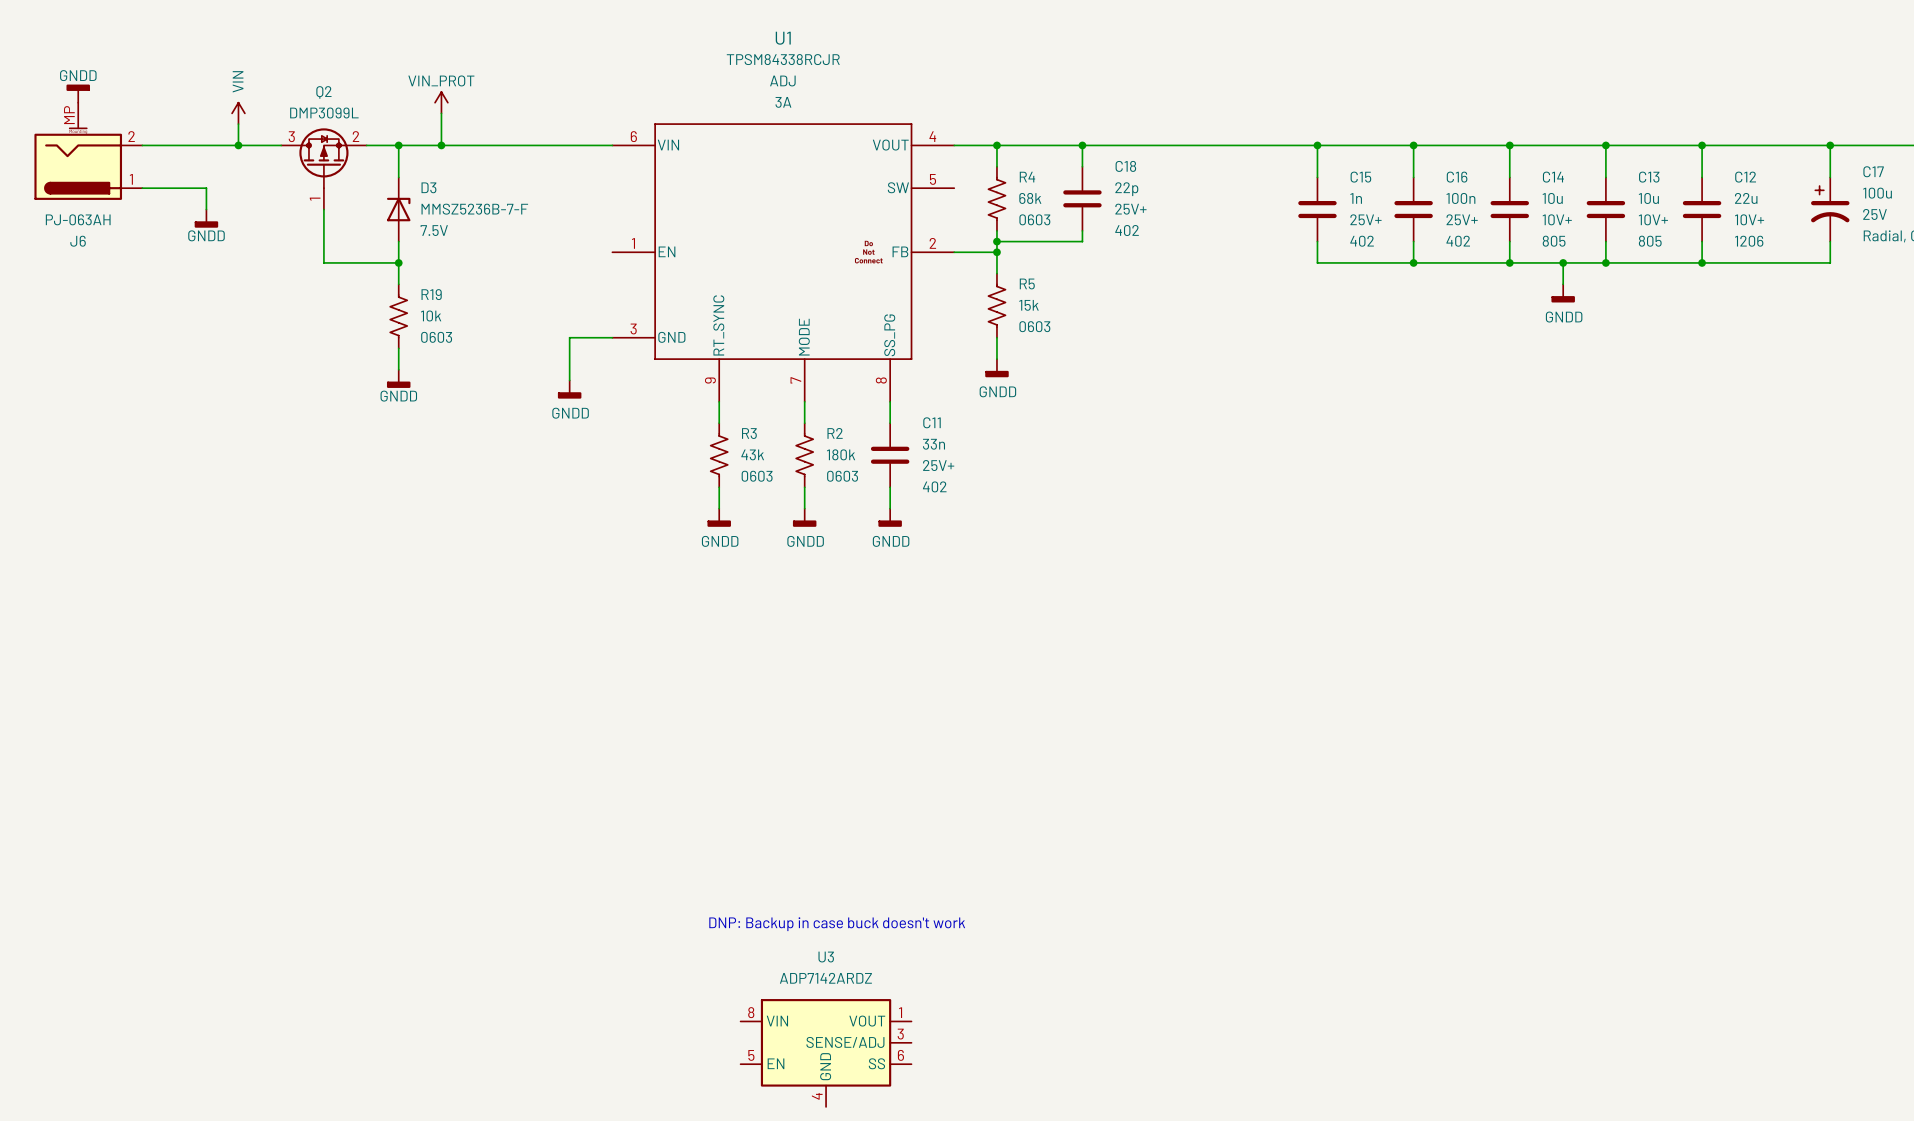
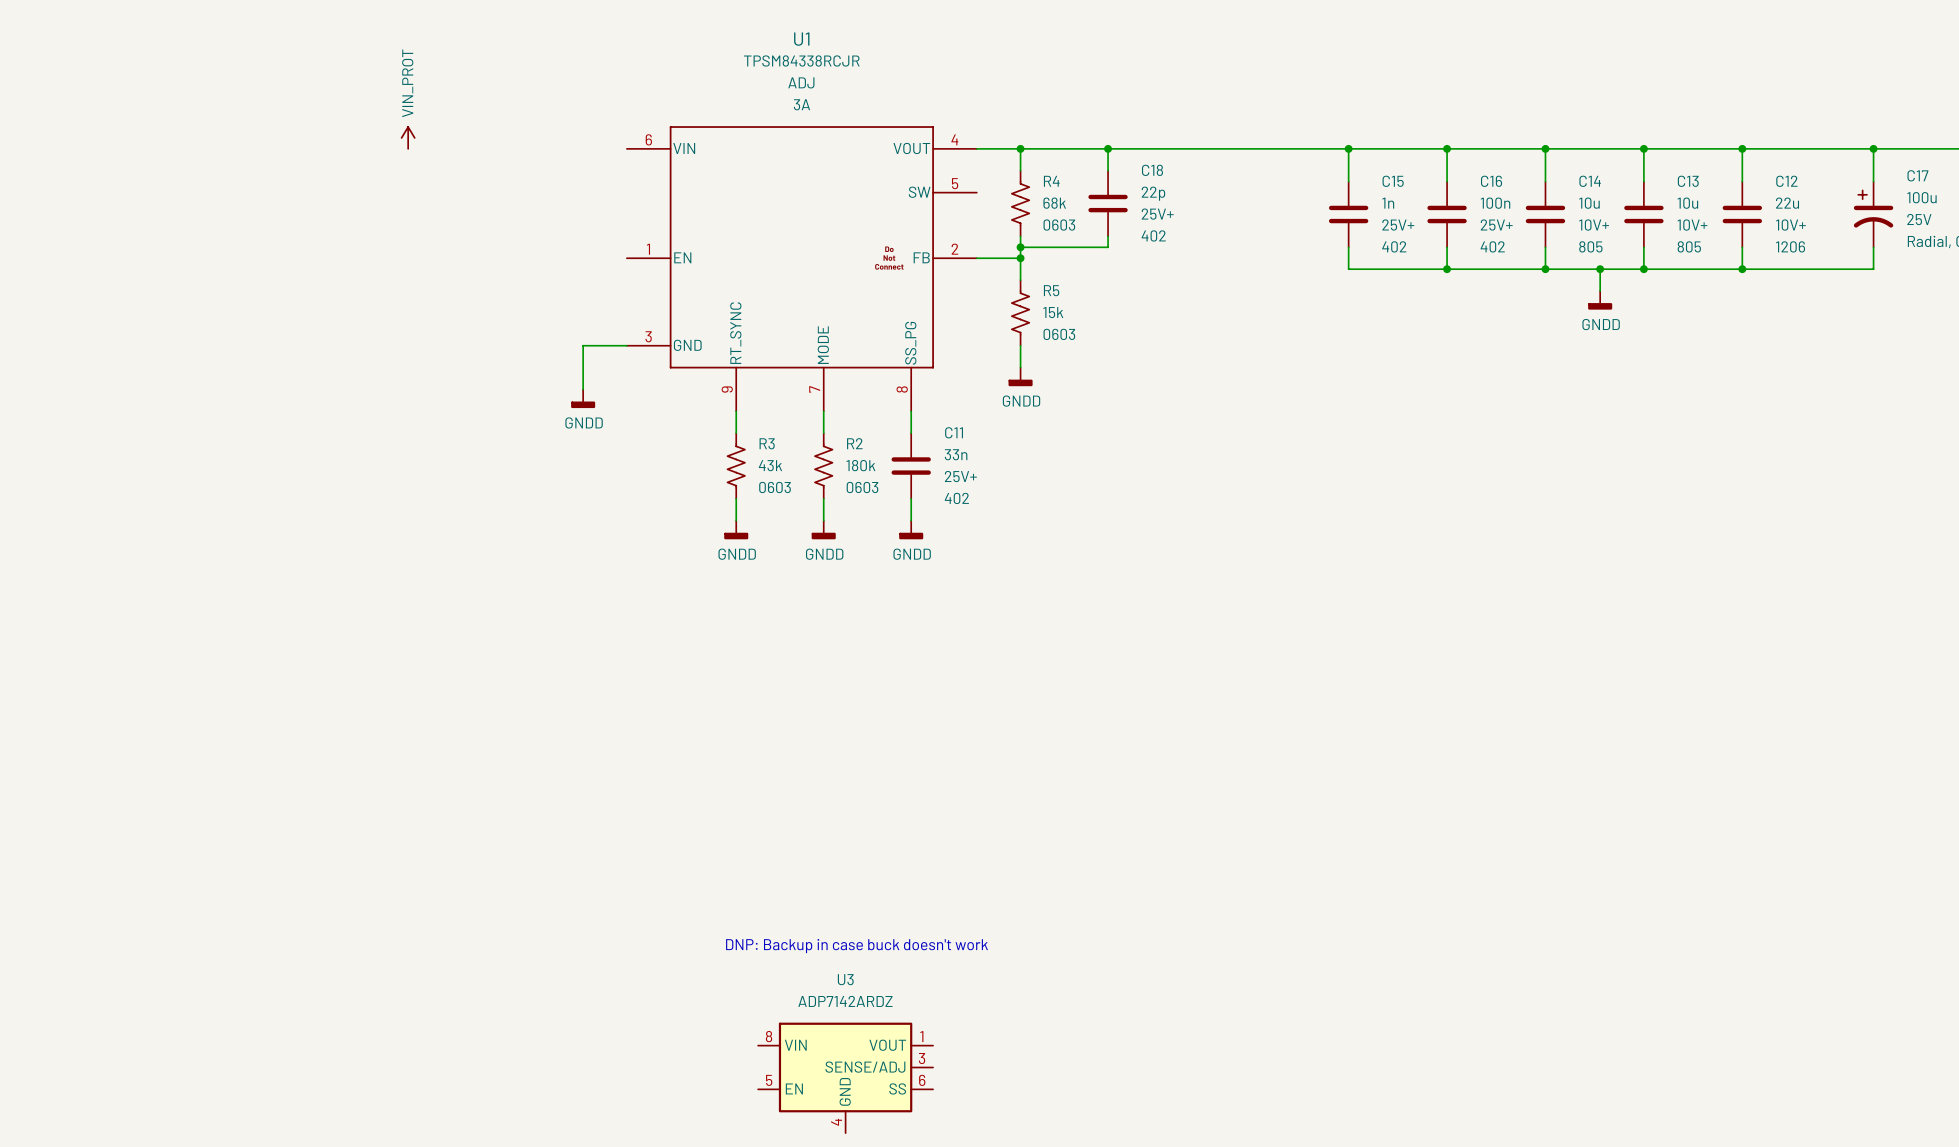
power symbol text rotation: 0° (441, 80) -> 90° counterclockwise (407, 83)
power symbol: GNDD (78, 93) -> none
power symbol position: VIN_PROT (441, 102) -> VIN_PROT (408, 137)
power symbol: VIN (238, 113) -> none
wire: (441, 113) (441, 145) -> none
wire: (238, 124) (238, 145) -> none
wire: (142, 145) (281, 145) -> none
junction: (238, 145) -> none
wire: (366, 145) (612, 145) -> none
wire: (398, 145) (398, 177) -> none
junction: (398, 145) -> none
junction: (441, 145) -> none
J6: (88, 151) -> none
Q2: (323, 168) -> none
wire: (142, 188) (206, 188) (206, 209) -> none
wire: (323, 209) (323, 262) (398, 262) -> none
D3: MMSZ5236B-7-F (398, 209) -> none
power symbol: GNDD (206, 218) -> none
wire: (398, 241) (398, 284) -> none
junction: (398, 262) -> none
R19: (398, 316) -> none
wire: (398, 348) (398, 369) -> none
power symbol: GNDD (398, 378) -> none

